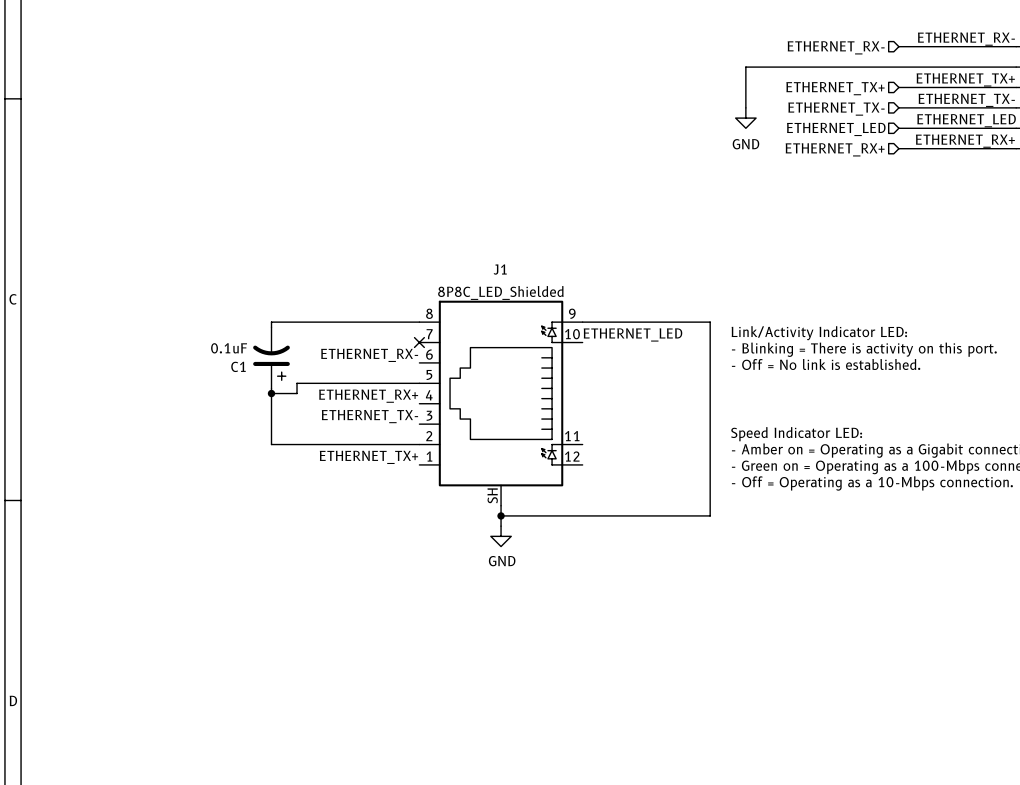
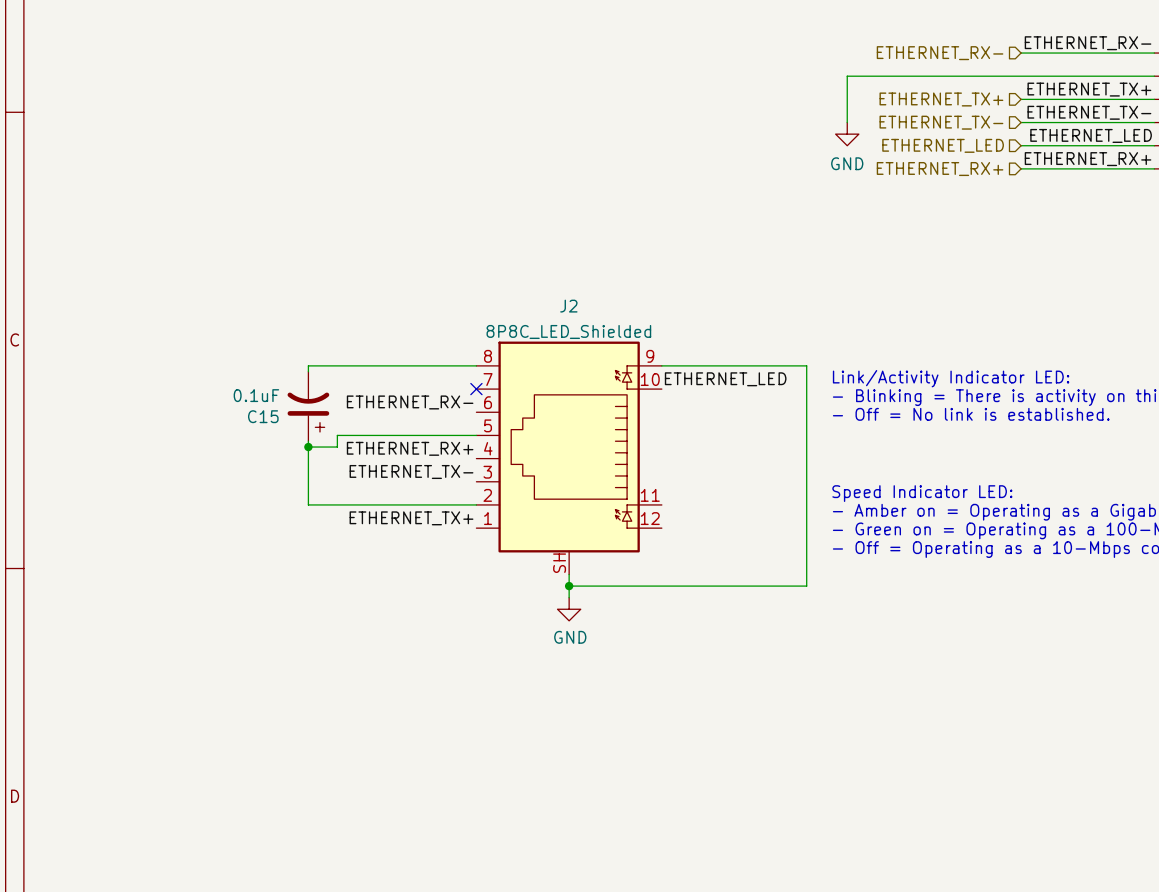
J1 name: J1 (500, 269) -> J2 (568, 306)
C1 name: C1 (238, 366) -> C15 (263, 416)

